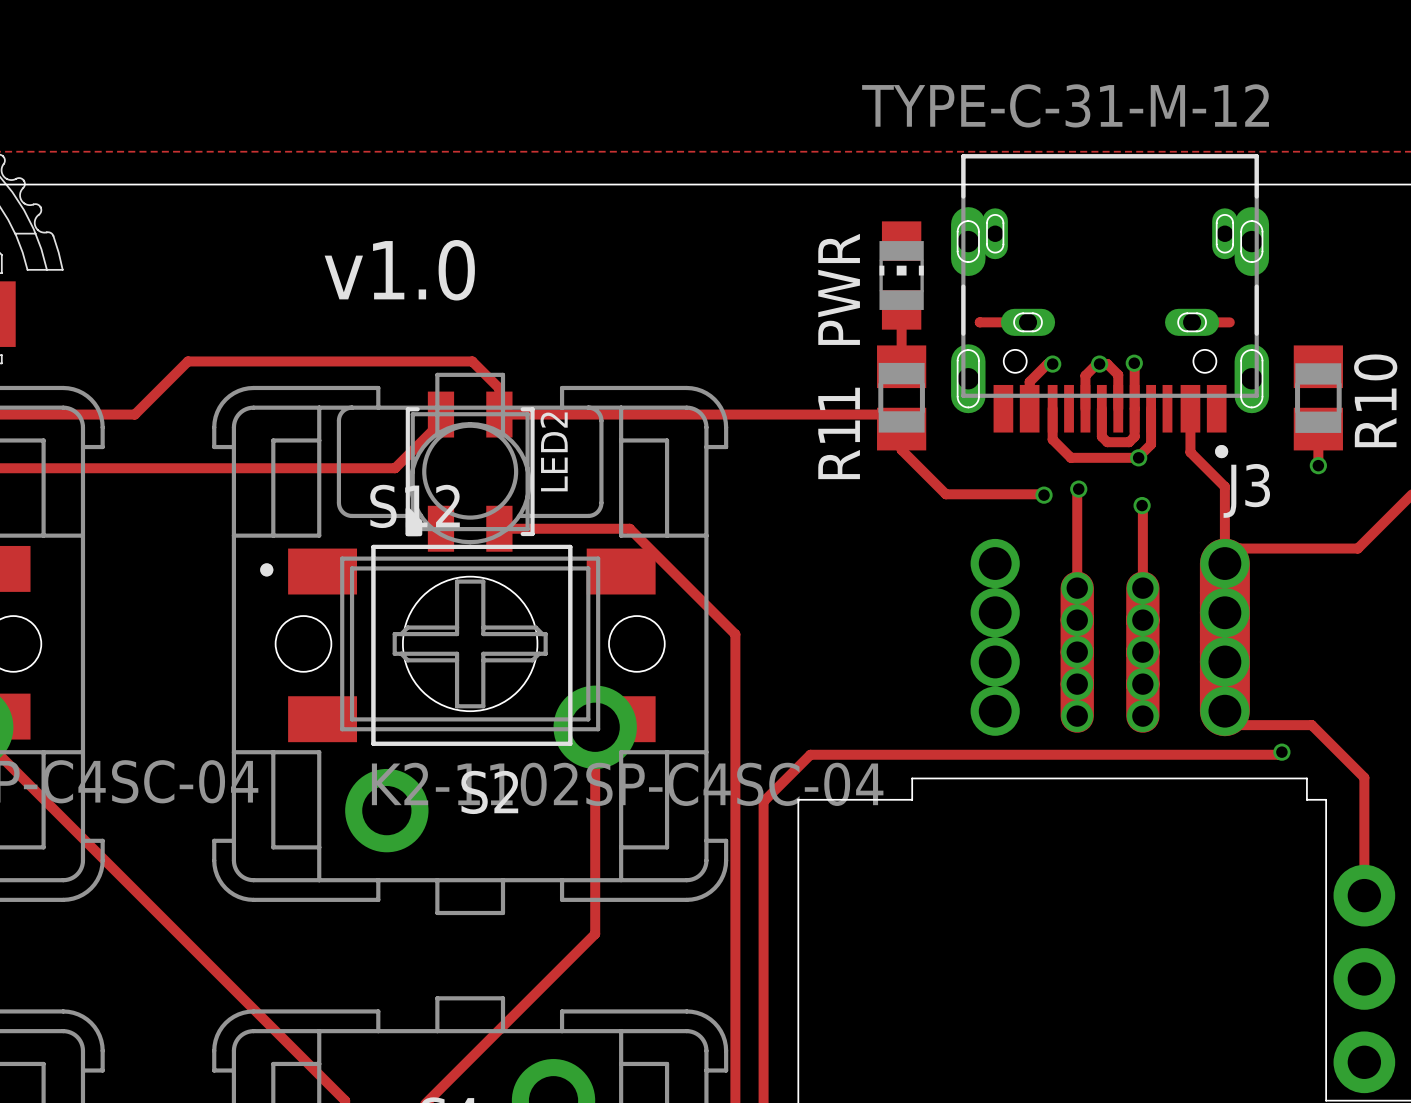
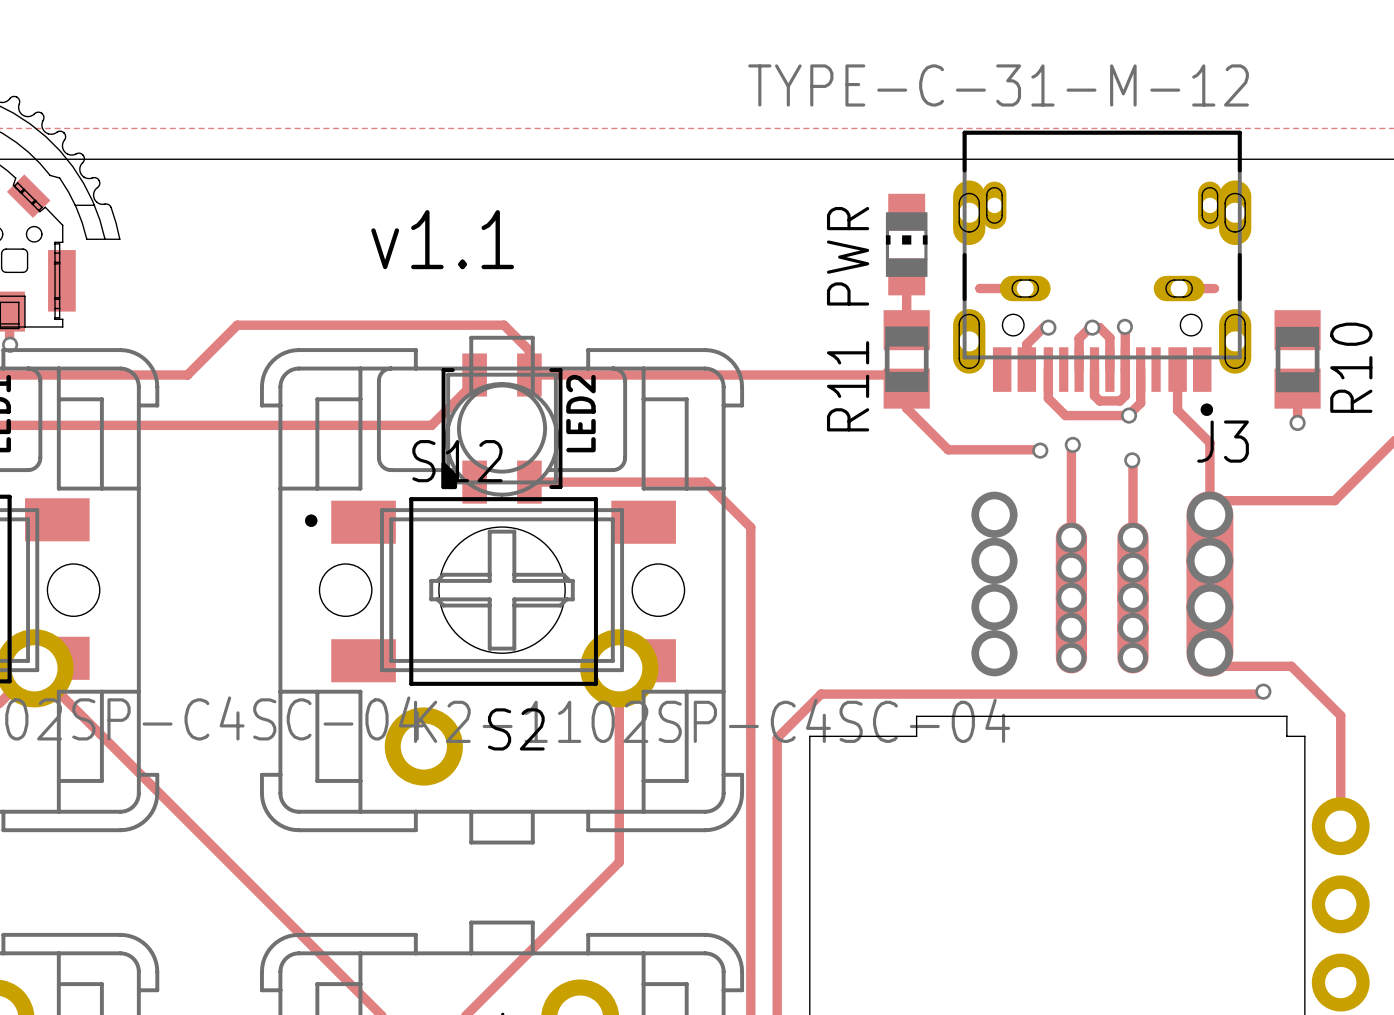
text: v1.0 (399, 270) -> v1.1 (442, 239)
track: (629, 528) (735, 634) -> (651, 482) (705, 482) (750, 527) (750, 581)

